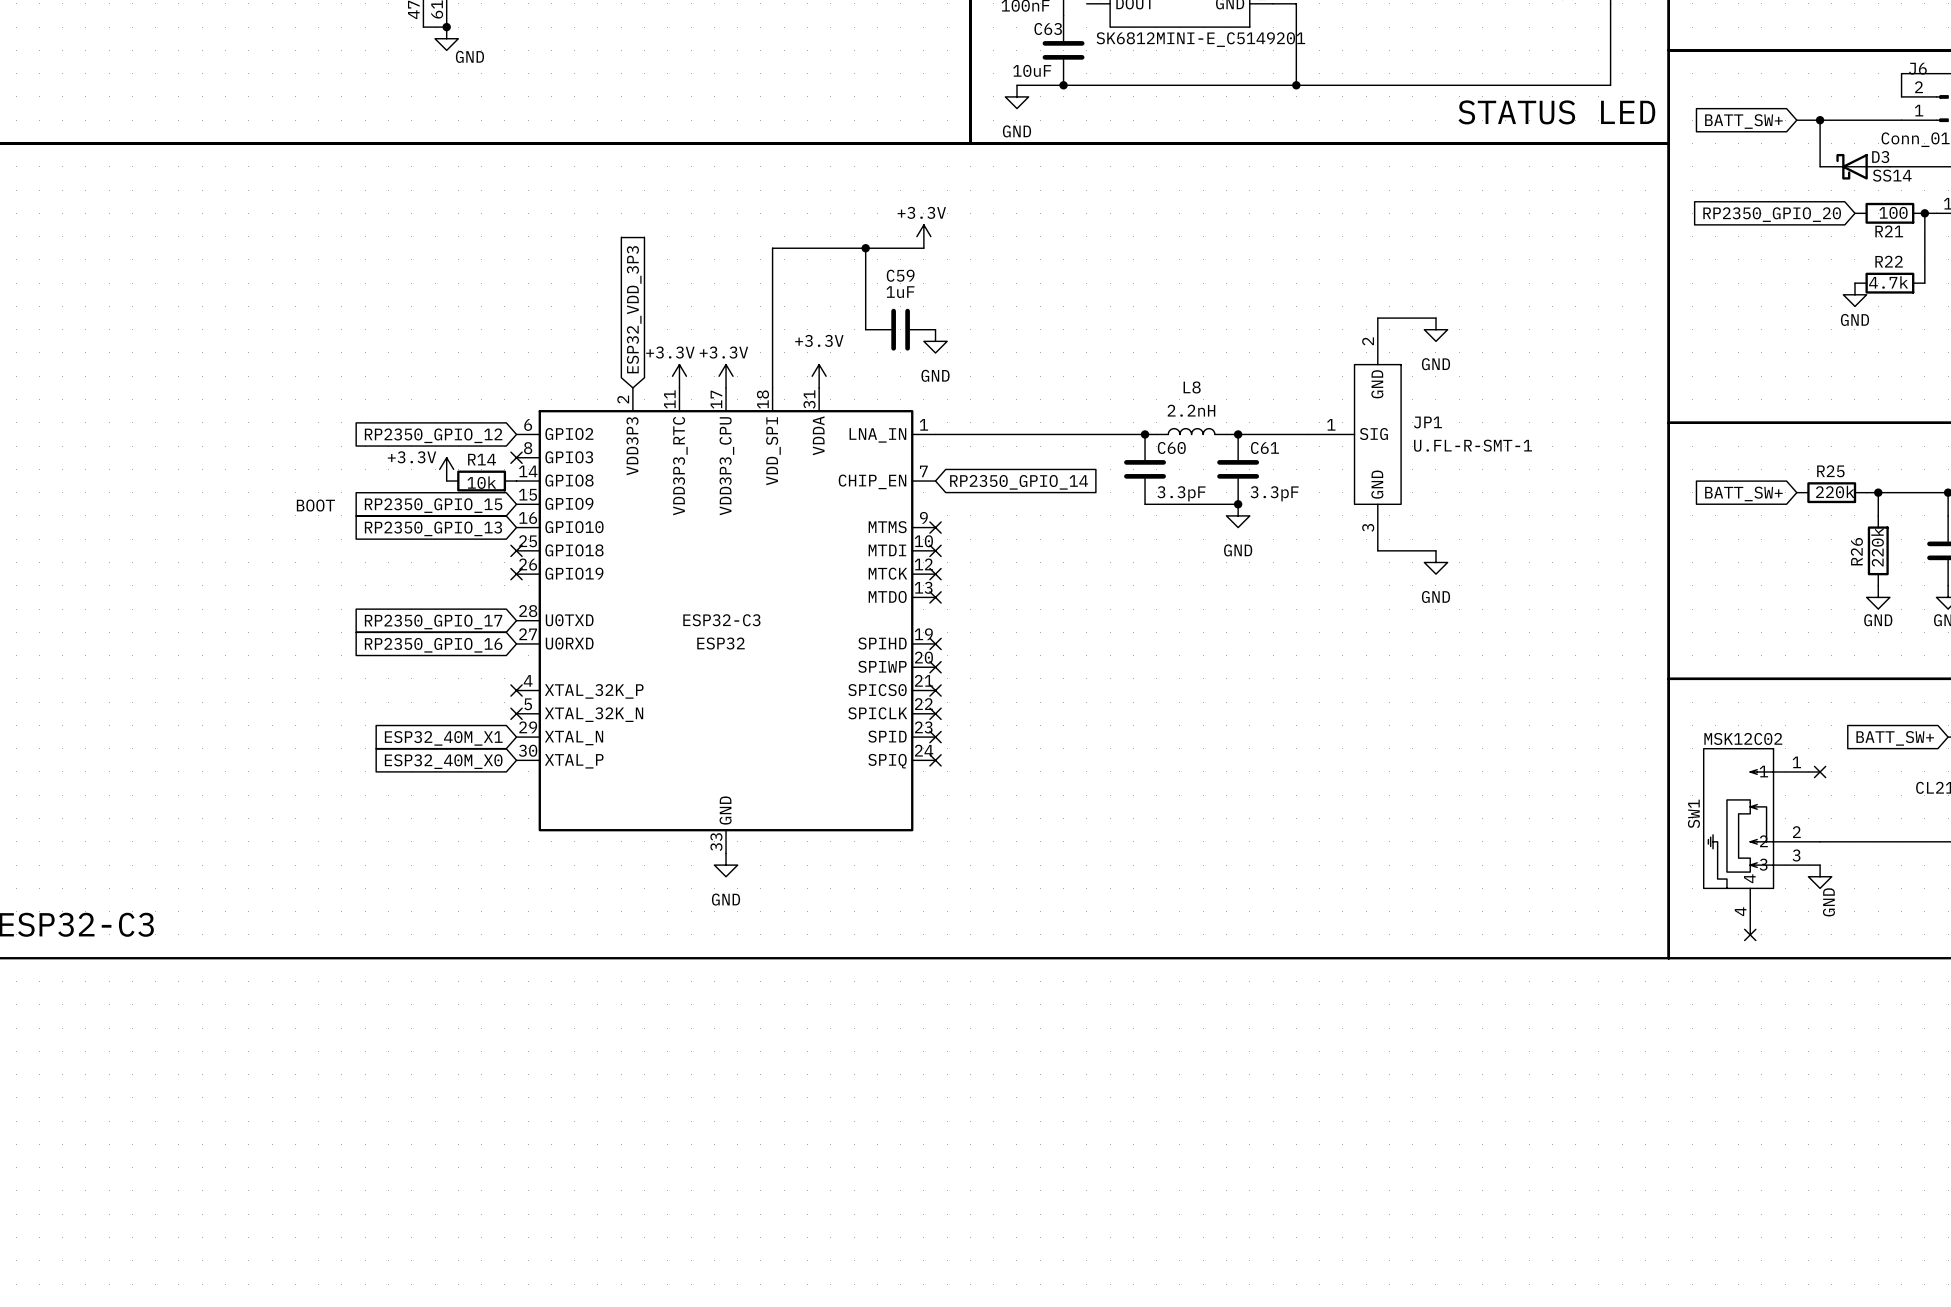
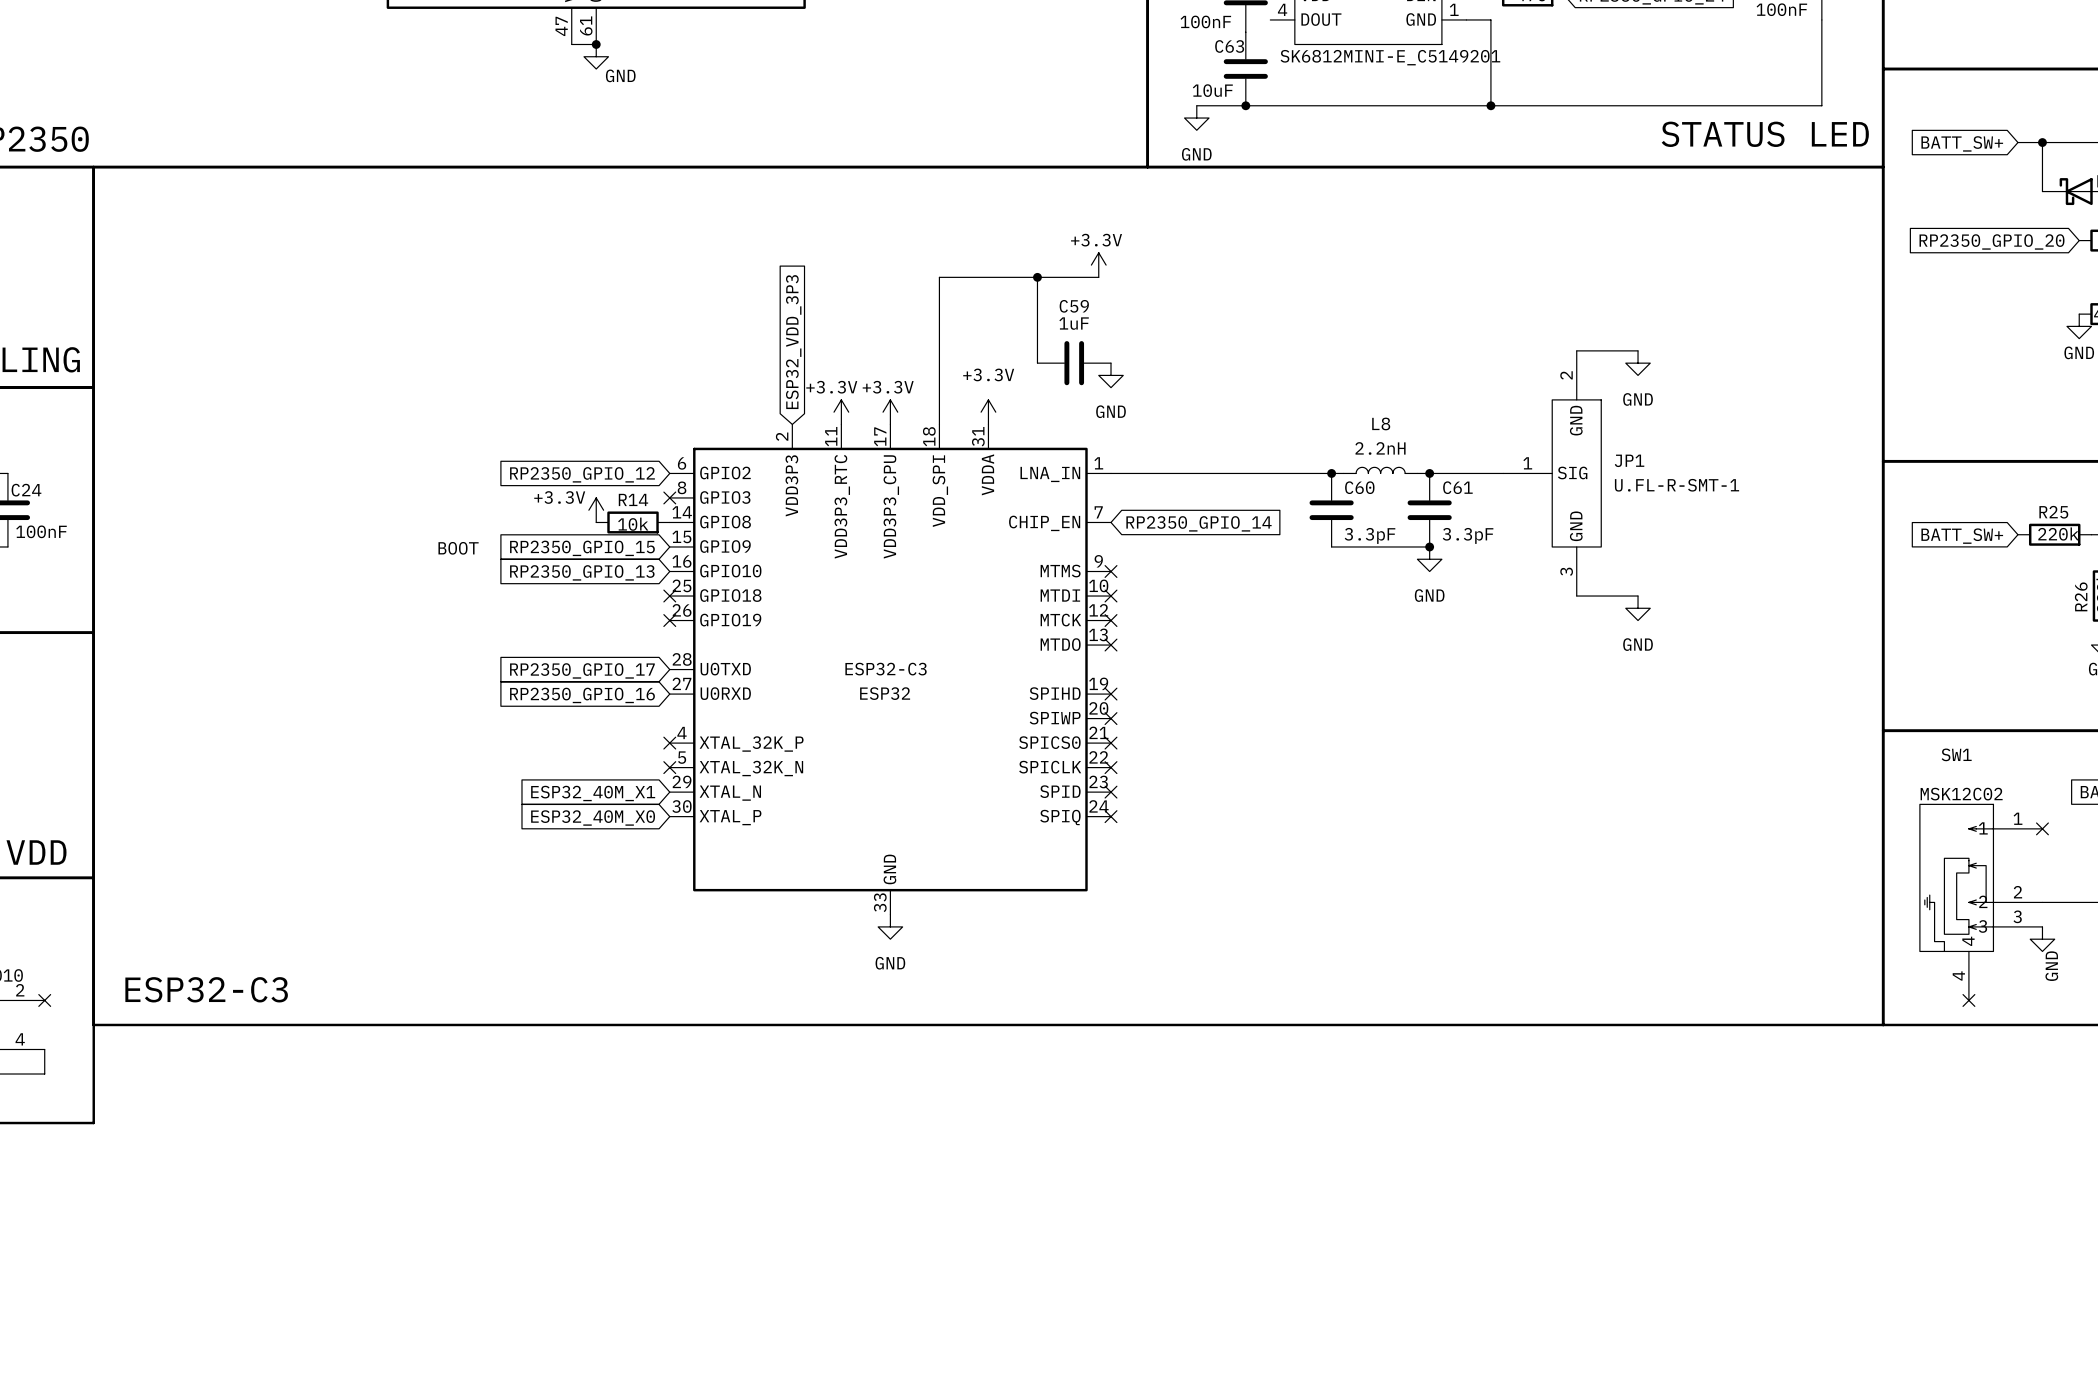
SW1 name rotation: 0° (1693, 813) -> 90° clockwise (1956, 754)
SW1 name position: SW1 (1693, 813) -> SW1 (1956, 754)

